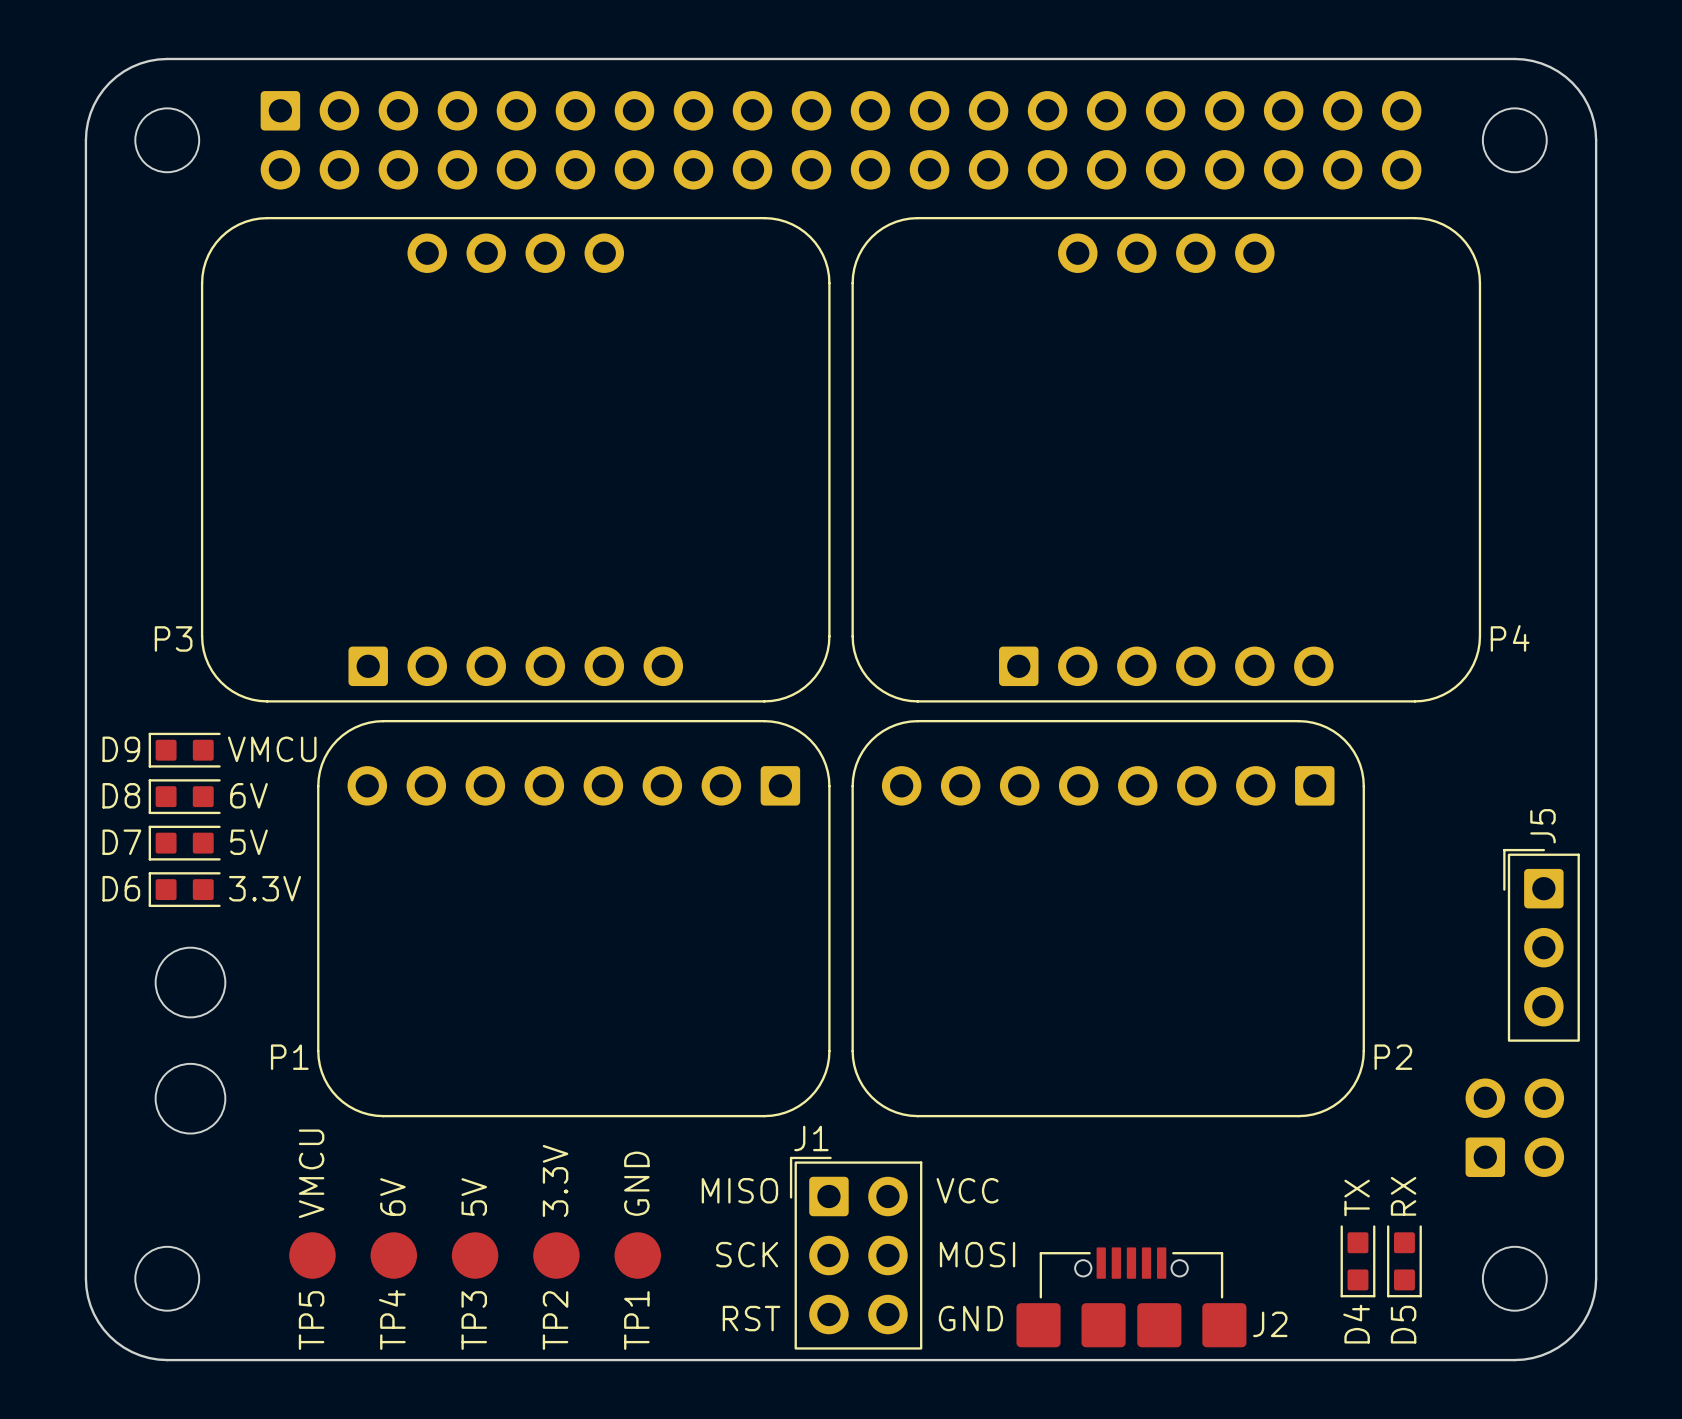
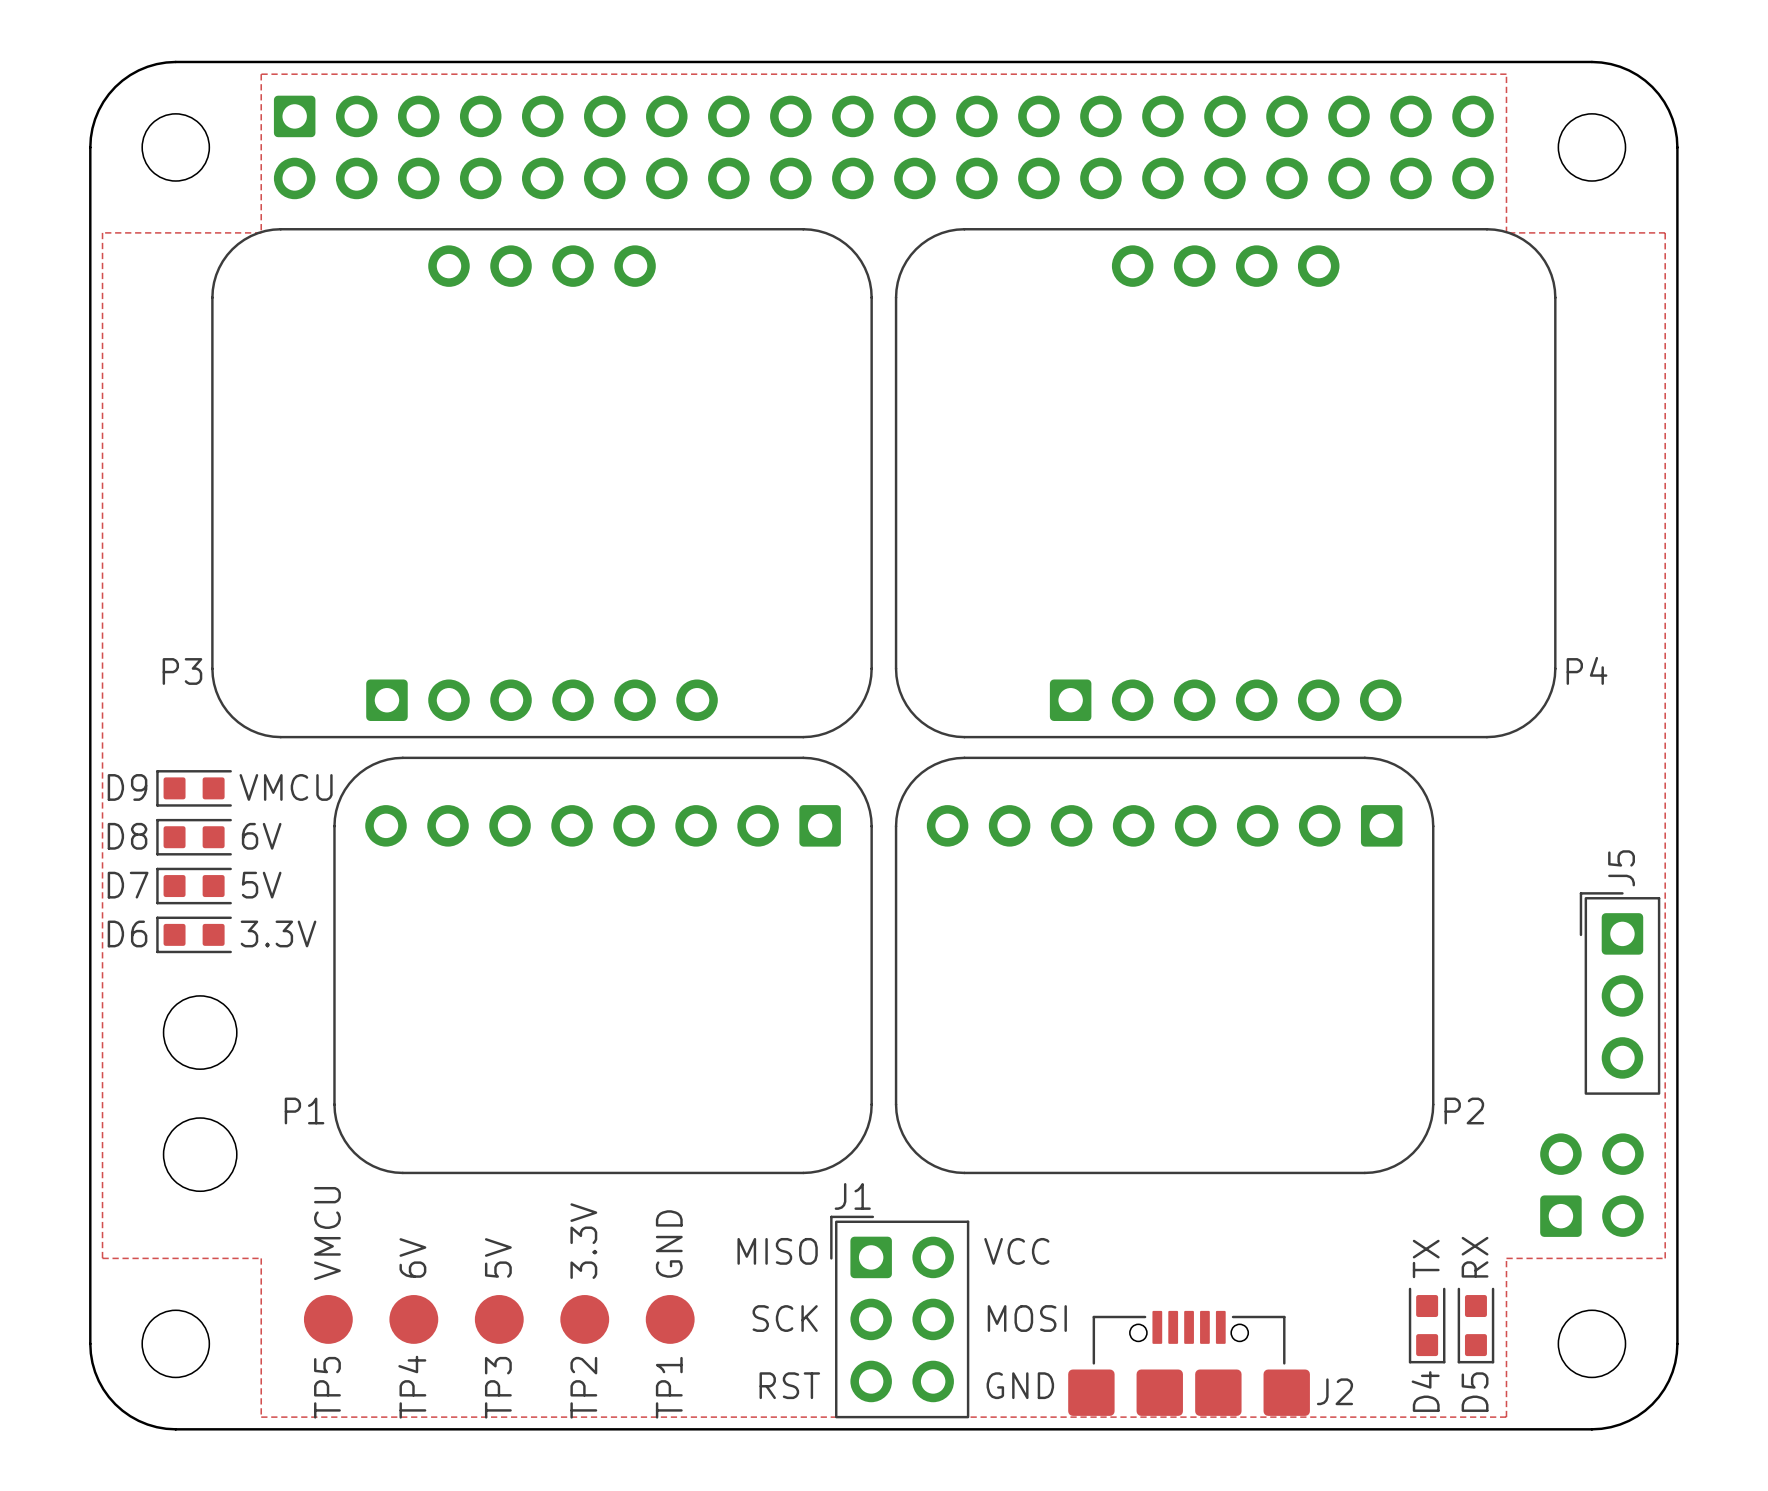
zone outline: none -> (261, 74) (261, 232) (102, 232) (102, 1258) (261, 1258) (261, 1417) (1506, 1417) (1506, 1258) (1665, 1258) (1665, 232) (1506, 232) (1506, 74) (261, 74)

